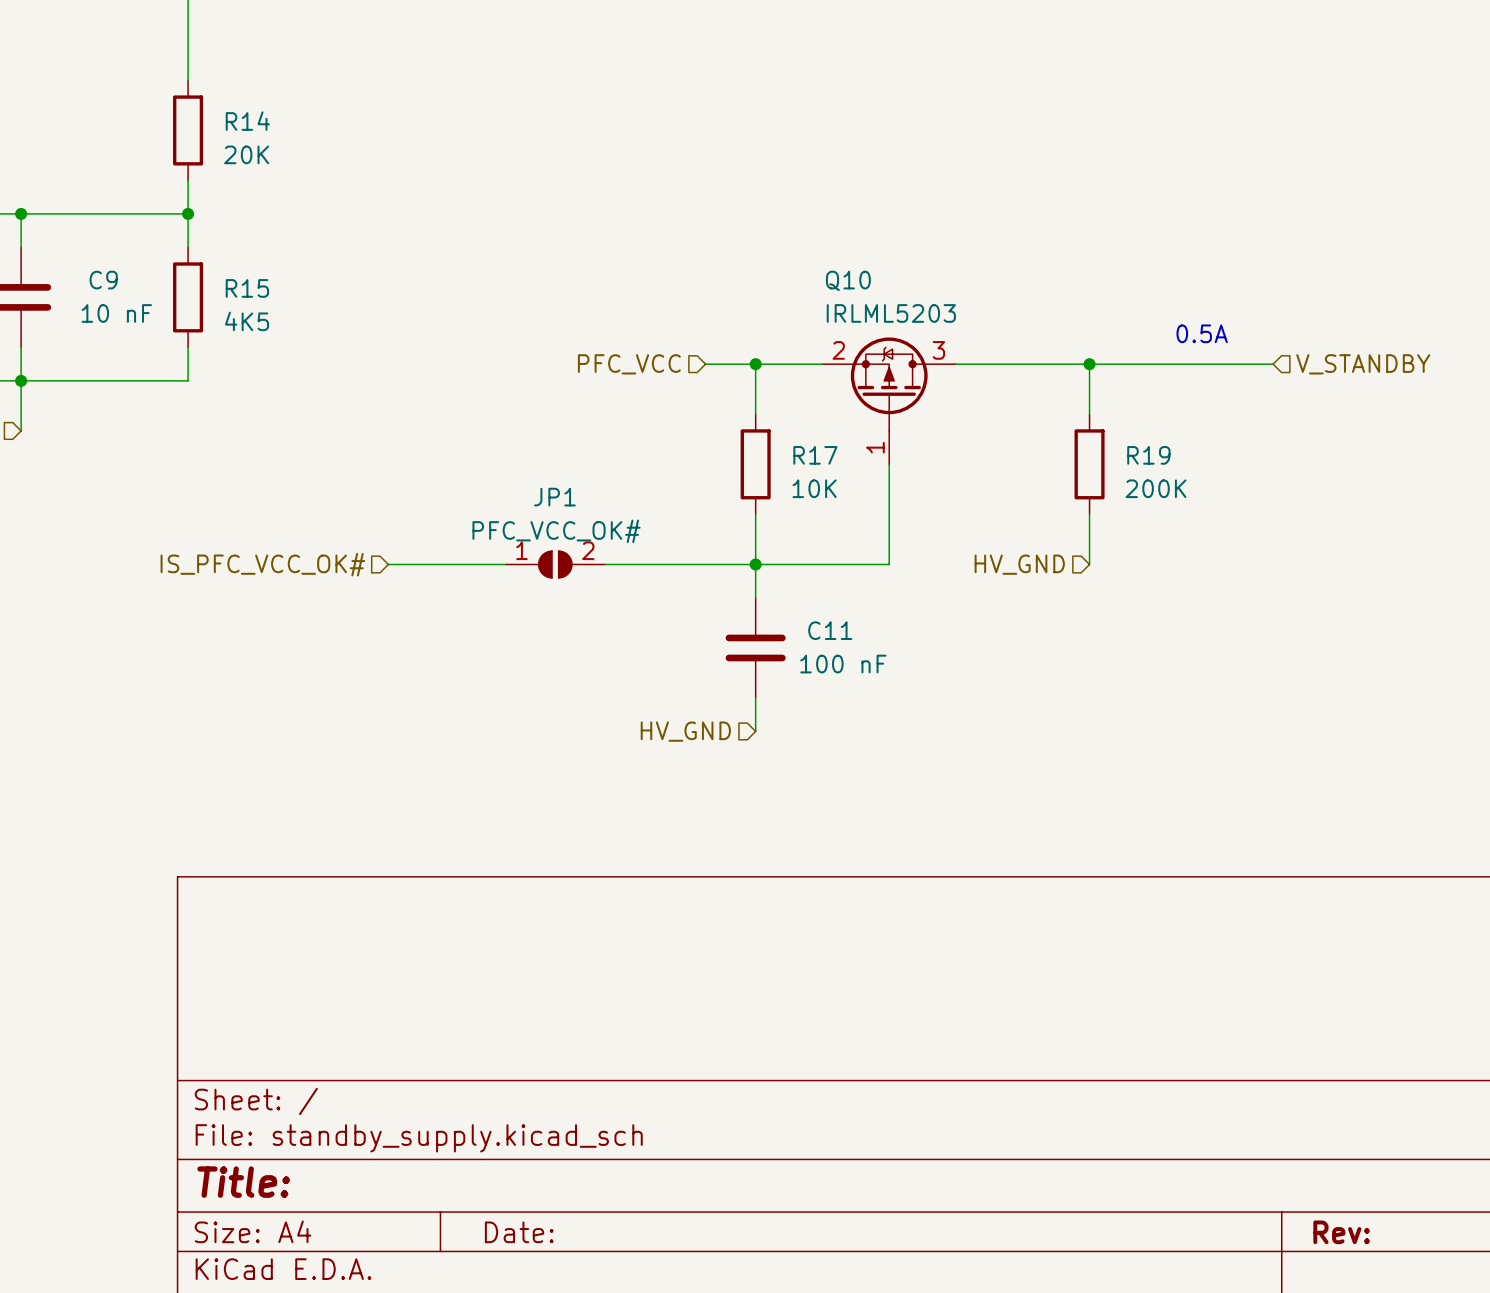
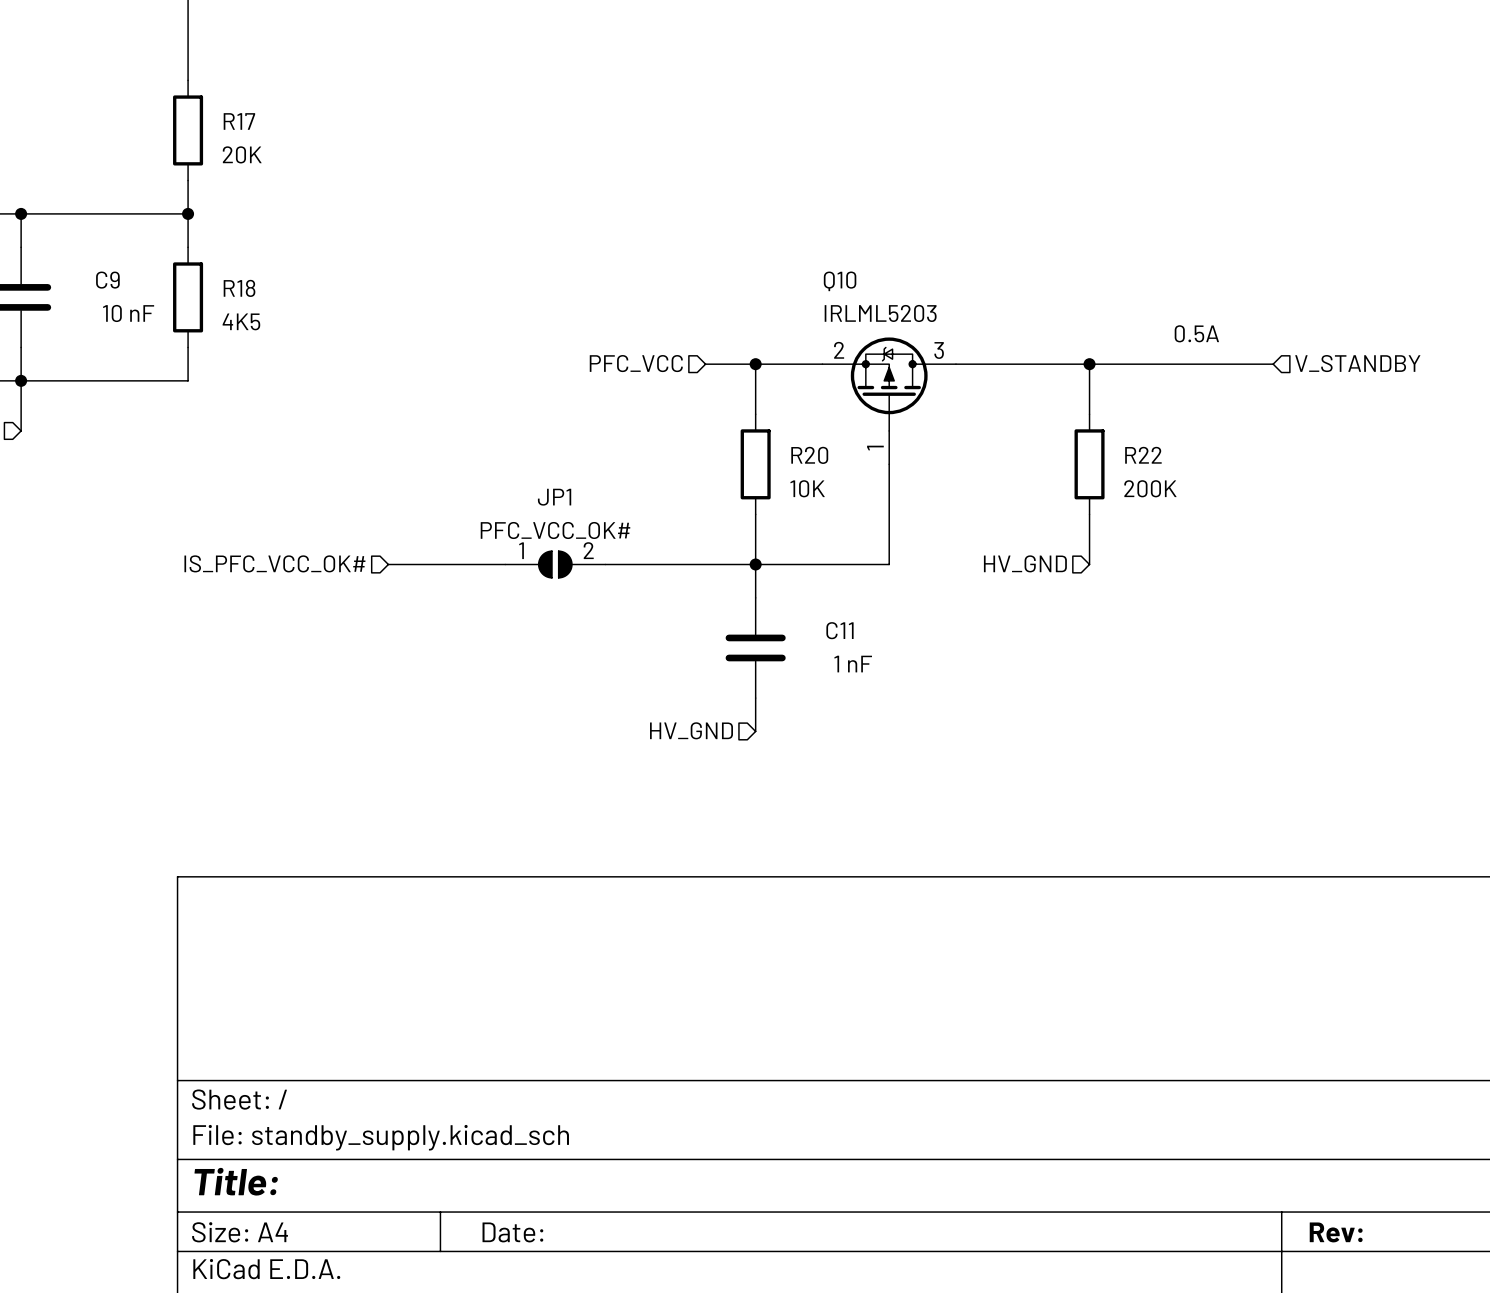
R14 name: R14 (247, 121) -> R17 (239, 121)
R15 name: R15 (247, 288) -> R18 (239, 288)
R17 name: R17 (815, 455) -> R20 (809, 455)
R19 name: R19 (1148, 455) -> R22 (1143, 455)
C11 value: 100 nF (843, 664) -> 1 nF (853, 664)

